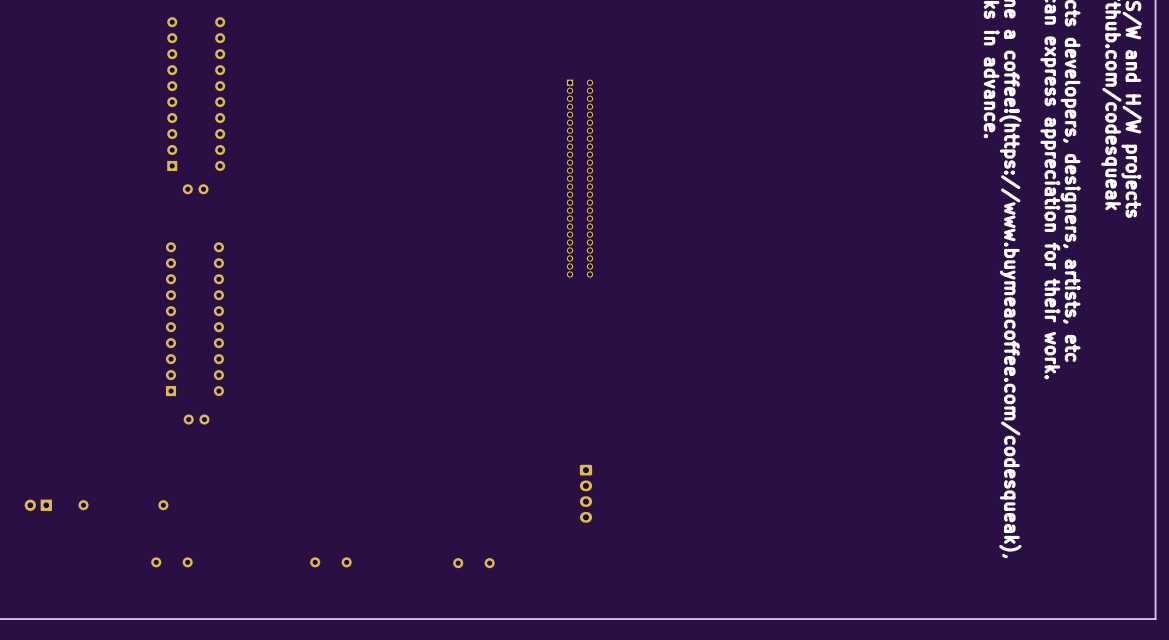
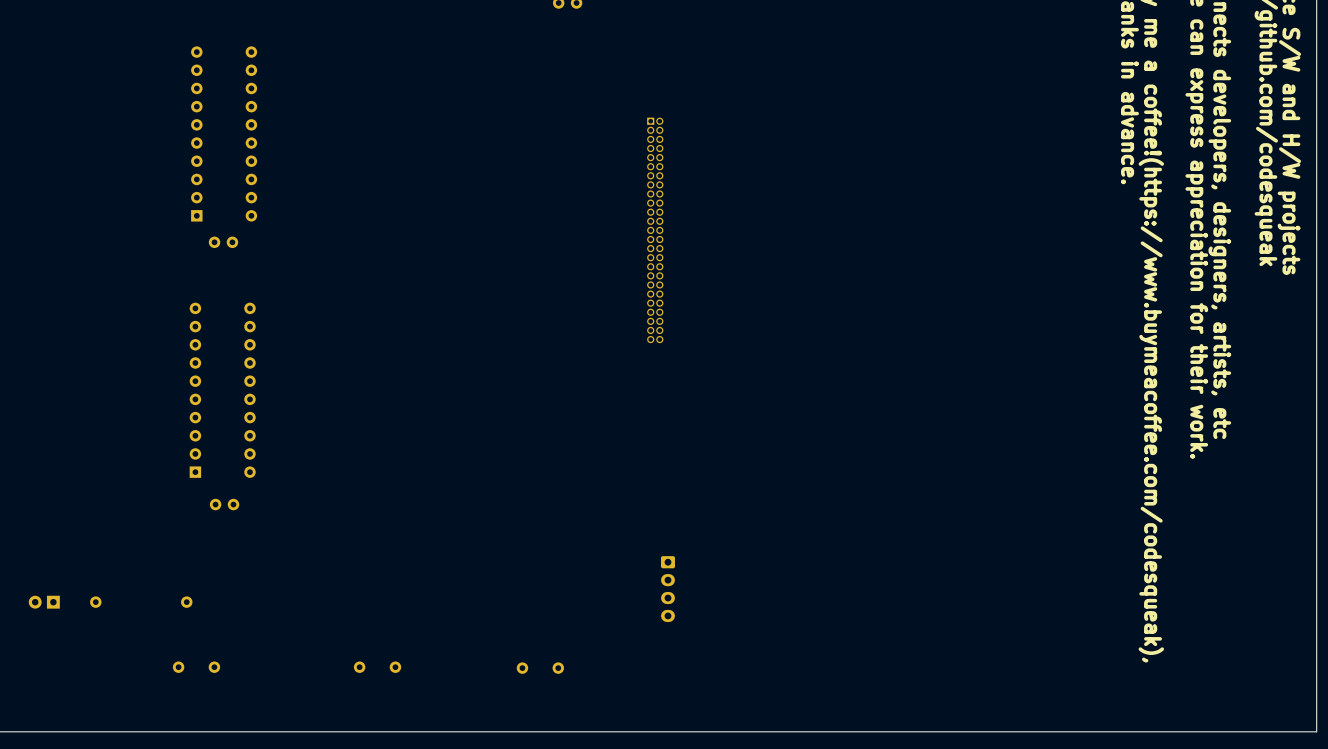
part footprint: [566, 79, 594, 278] -> [647, 117, 664, 344]

